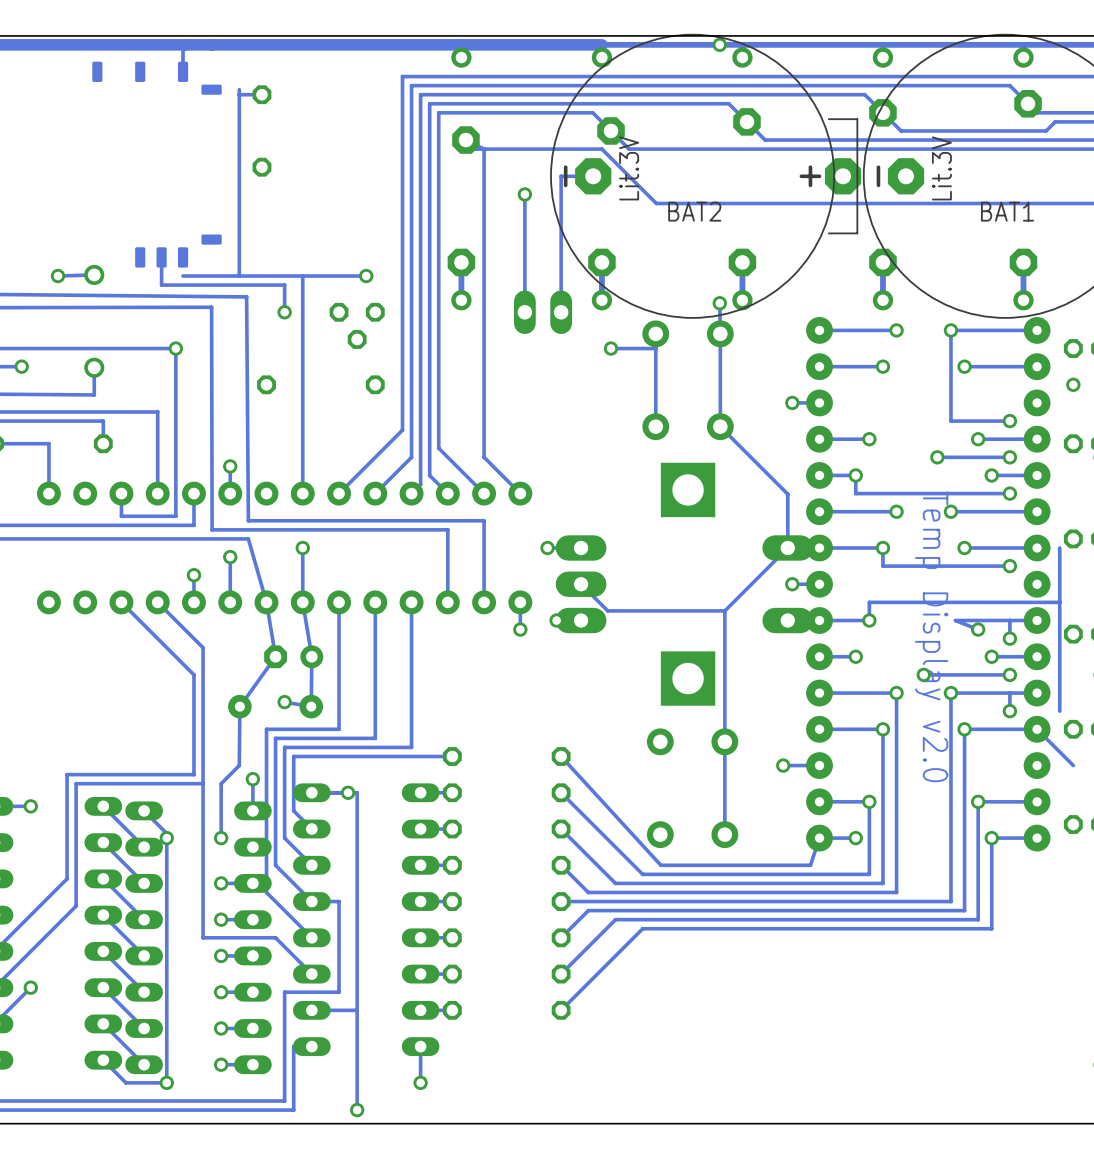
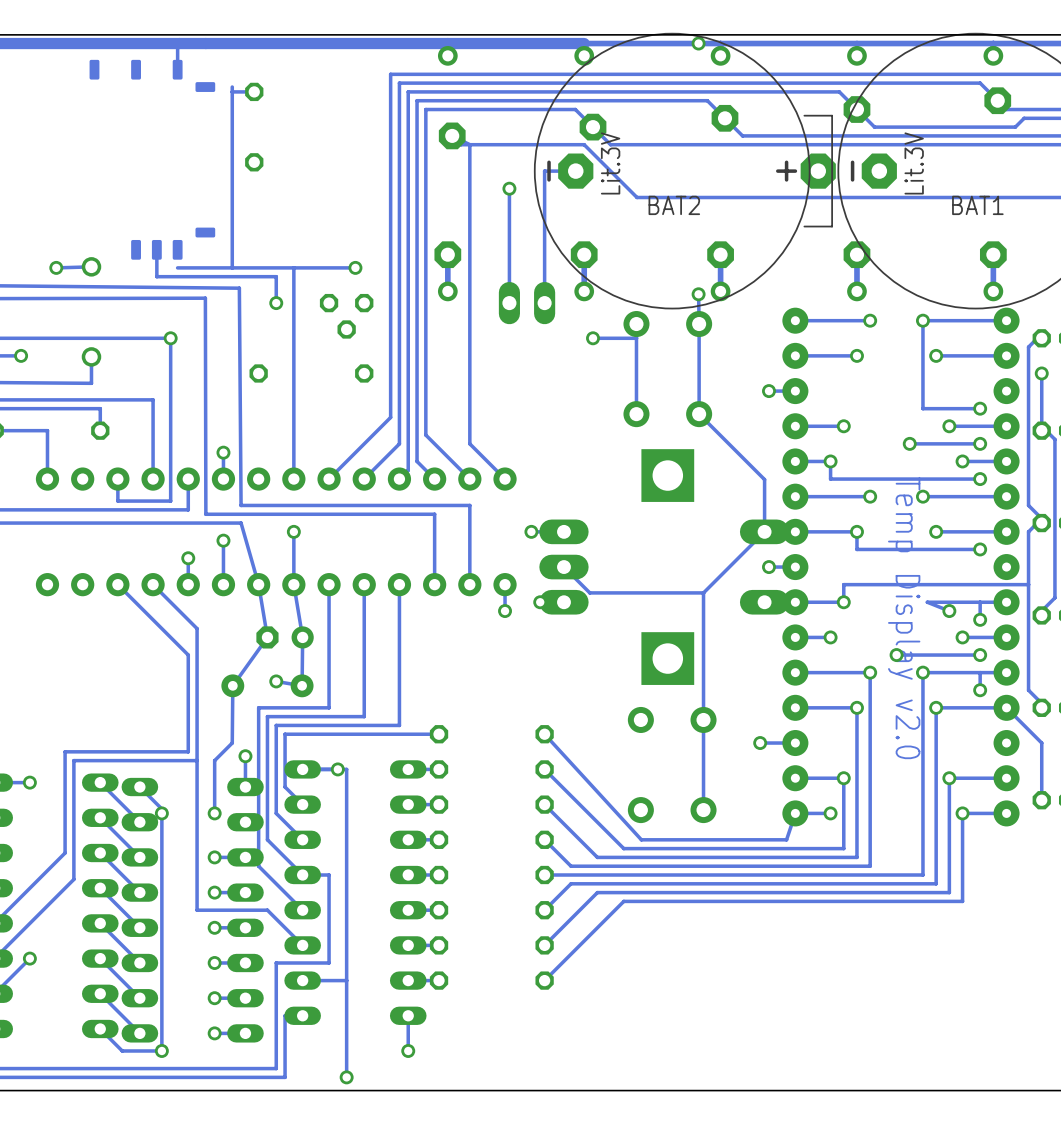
track: none -> (1041, 333) (1028, 347) (1028, 505) (1041, 518) (1028, 531)
track: none -> (1041, 373) (1041, 426) (1054, 439) (1054, 597) (1041, 611)
track: none -> (1028, 690) (1041, 703)
track: none -> (1041, 743) (1041, 795)

